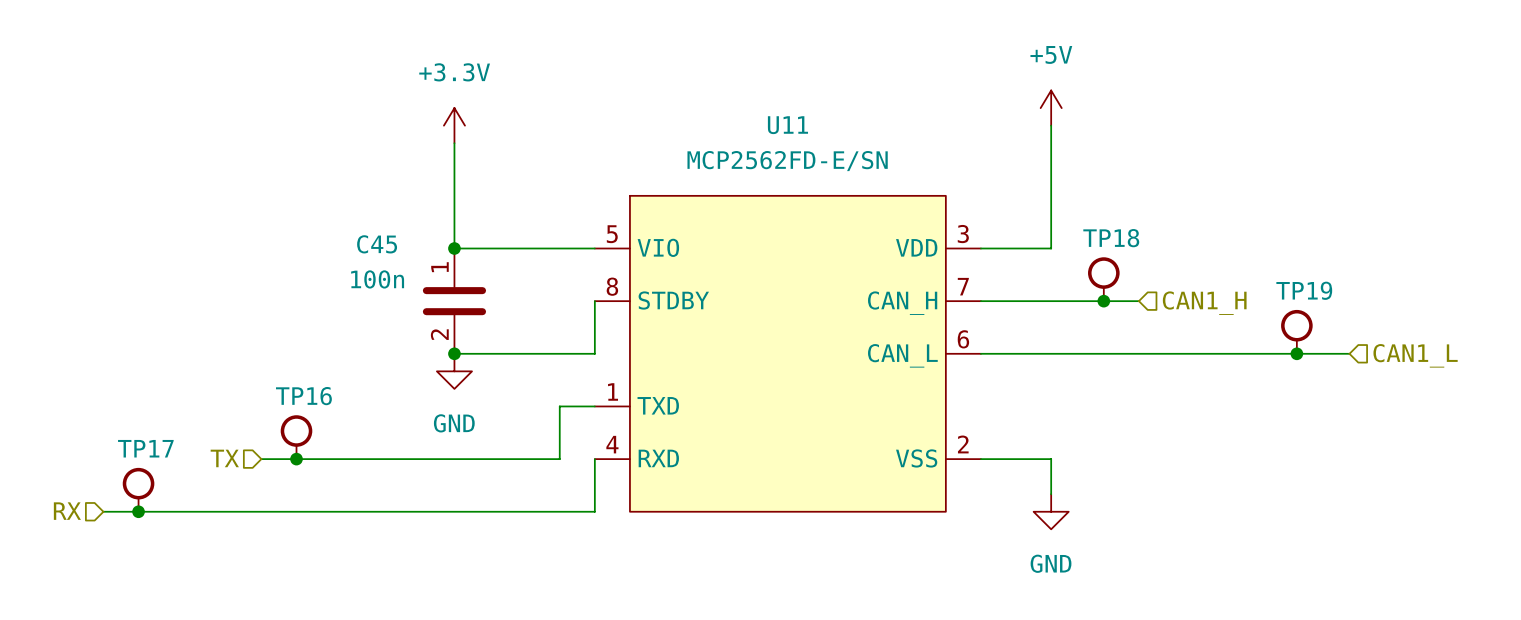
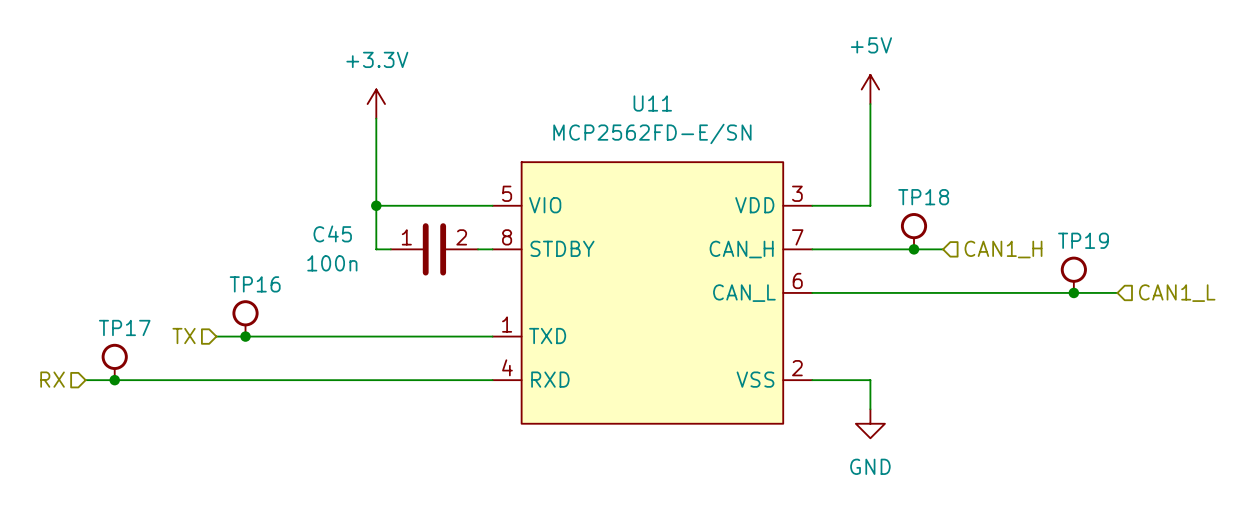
C45 name position: C45 (377, 244) -> C45 (332, 233)
wire: none -> (376, 205) (376, 249) (390, 249)
C45 value position: 100n (377, 279) -> 100n (332, 263)
C45 rotation: 0° (454, 301) -> 90° counterclockwise (434, 249)
C45 position: (454, 301) -> (434, 249)
wire: (594, 301) (594, 353) (454, 353) -> (492, 249) (478, 249)
junction: (454, 353) -> none
power symbol: GND (454, 371) -> none
wire: none -> (216, 336) (463, 336)
wire: (559, 406) (559, 459) -> (492, 380) (463, 380)
TP16 position: (296, 437) -> (245, 318)
hierarchical label position: TX (224, 458) -> TX (184, 336)
wire: none -> (85, 380) (216, 380)
junction position: (296, 459) -> (245, 336)
wire: (594, 459) (594, 511) (103, 511) -> none
TP17 position: (138, 489) -> (114, 361)
hierarchical label position: RX (67, 511) -> RX (52, 379)
junction position: (138, 511) -> (114, 380)

